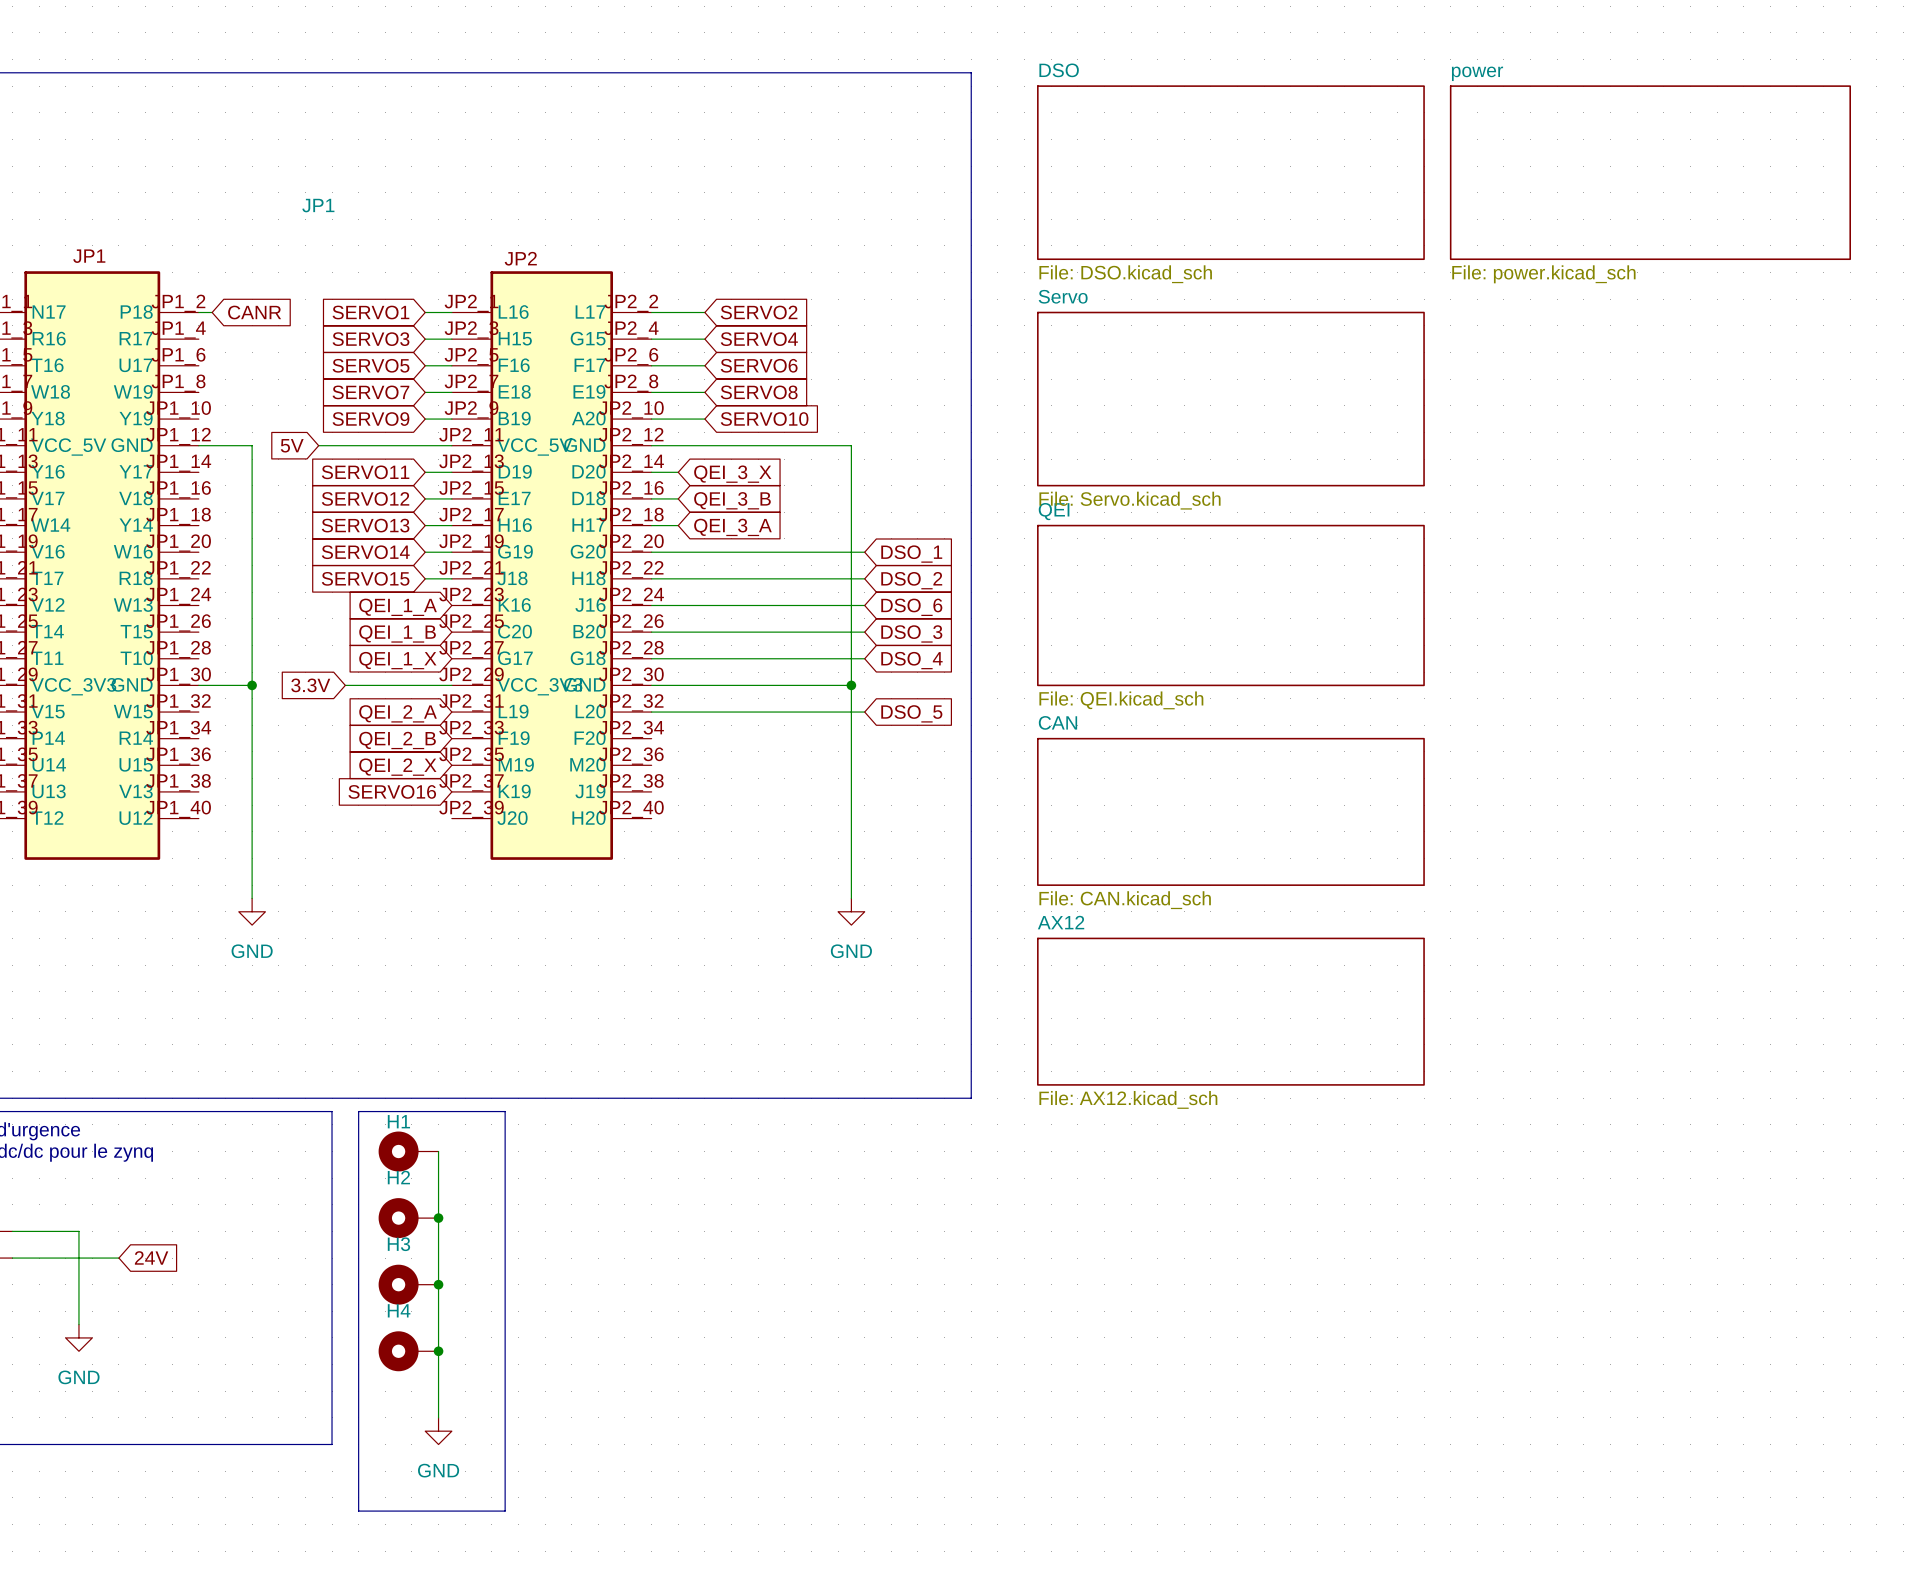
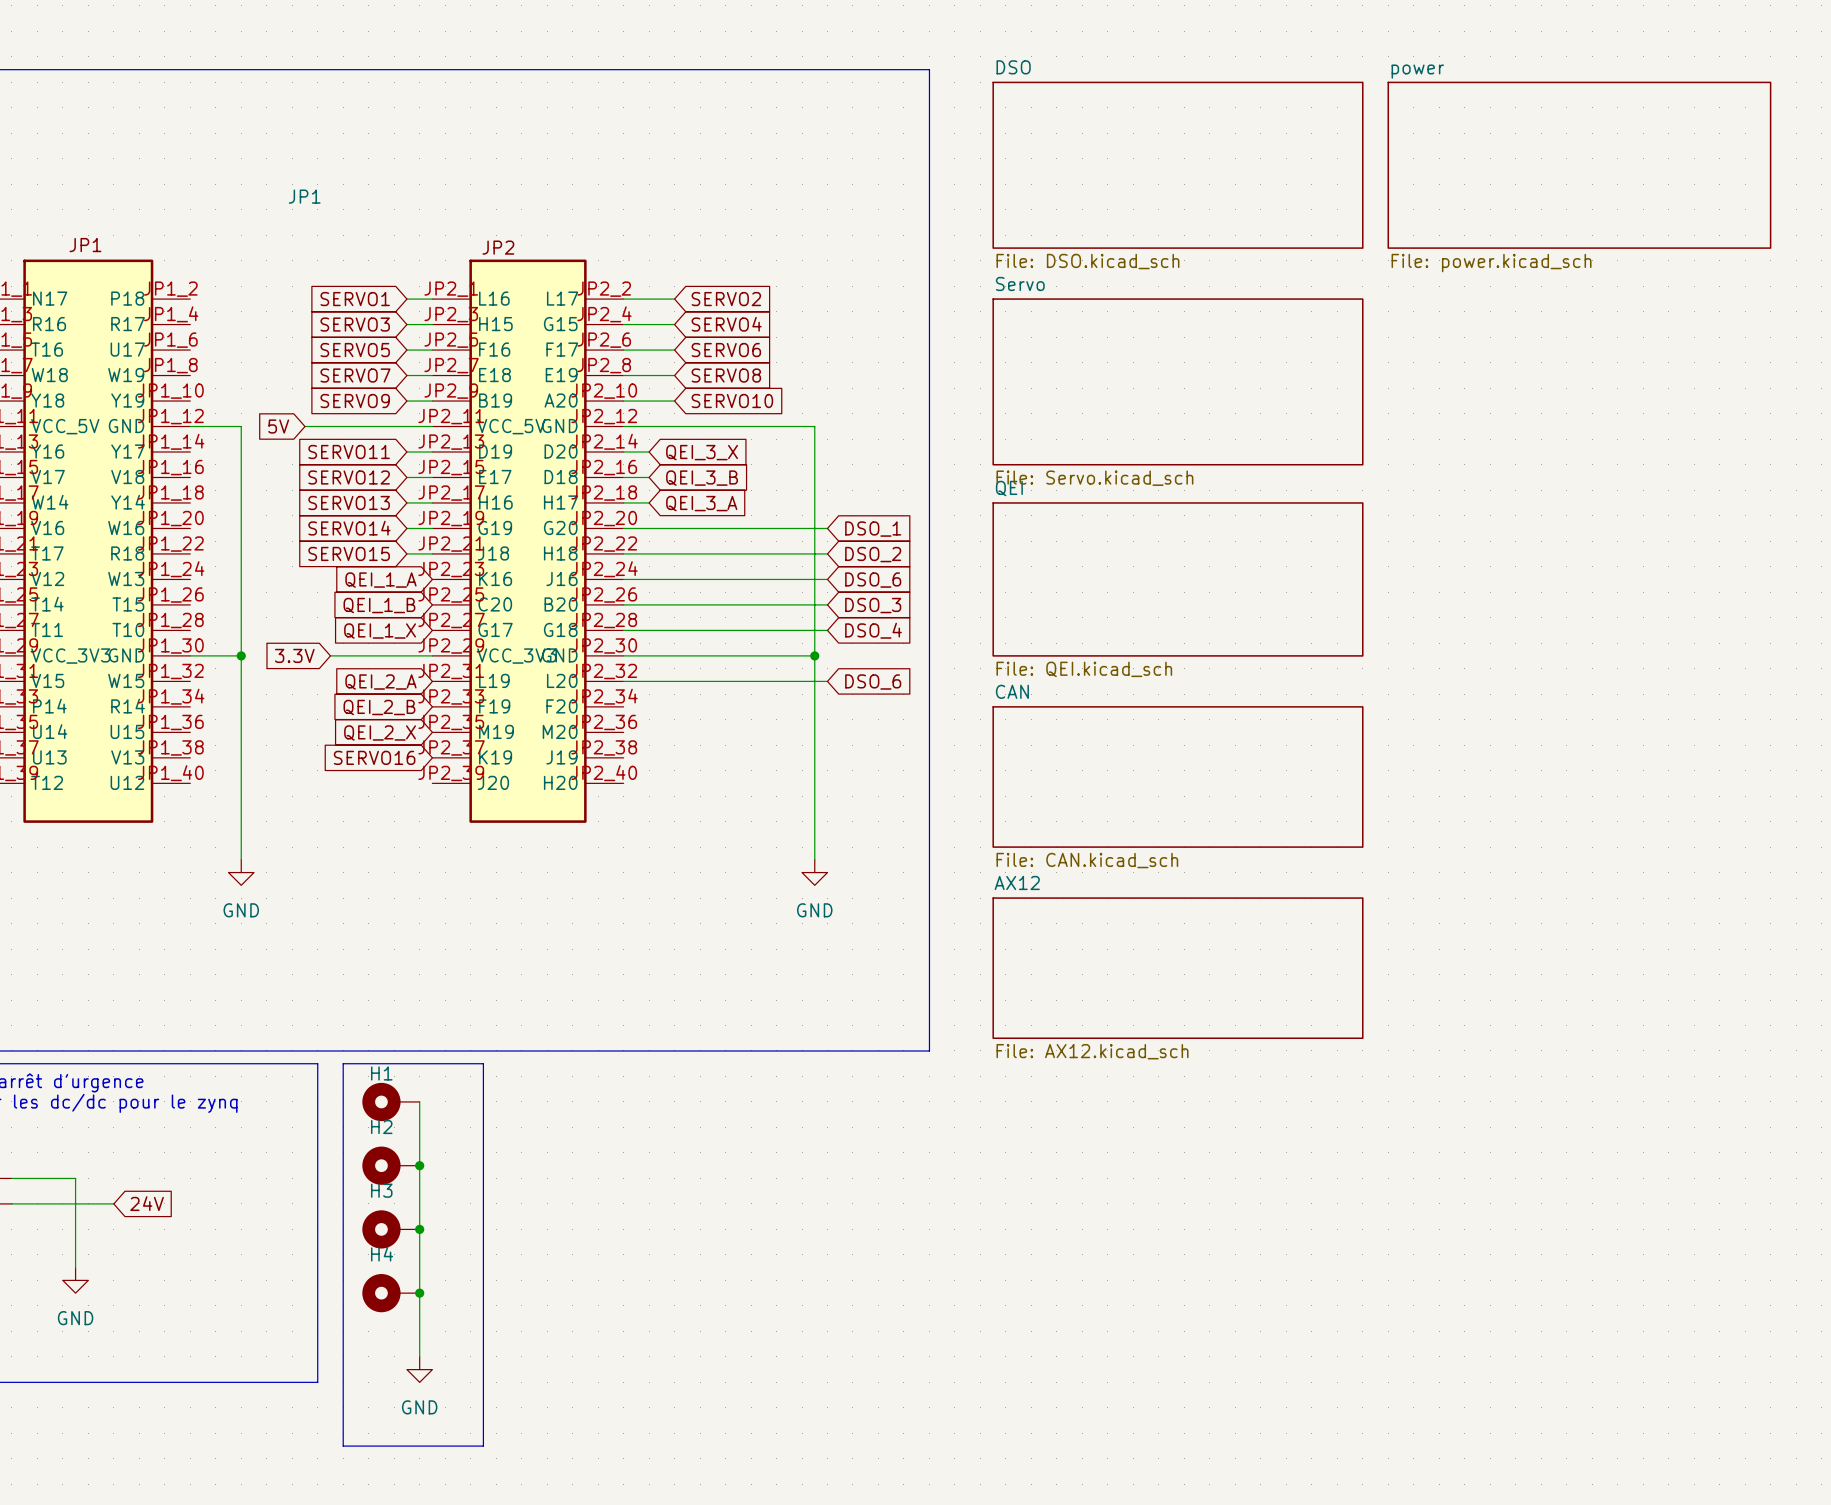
wire: (198, 312) (212, 312) -> none
global label: CANR (254, 312) -> none
global label: DSO_5 (911, 713) -> DSO_6 (873, 682)

